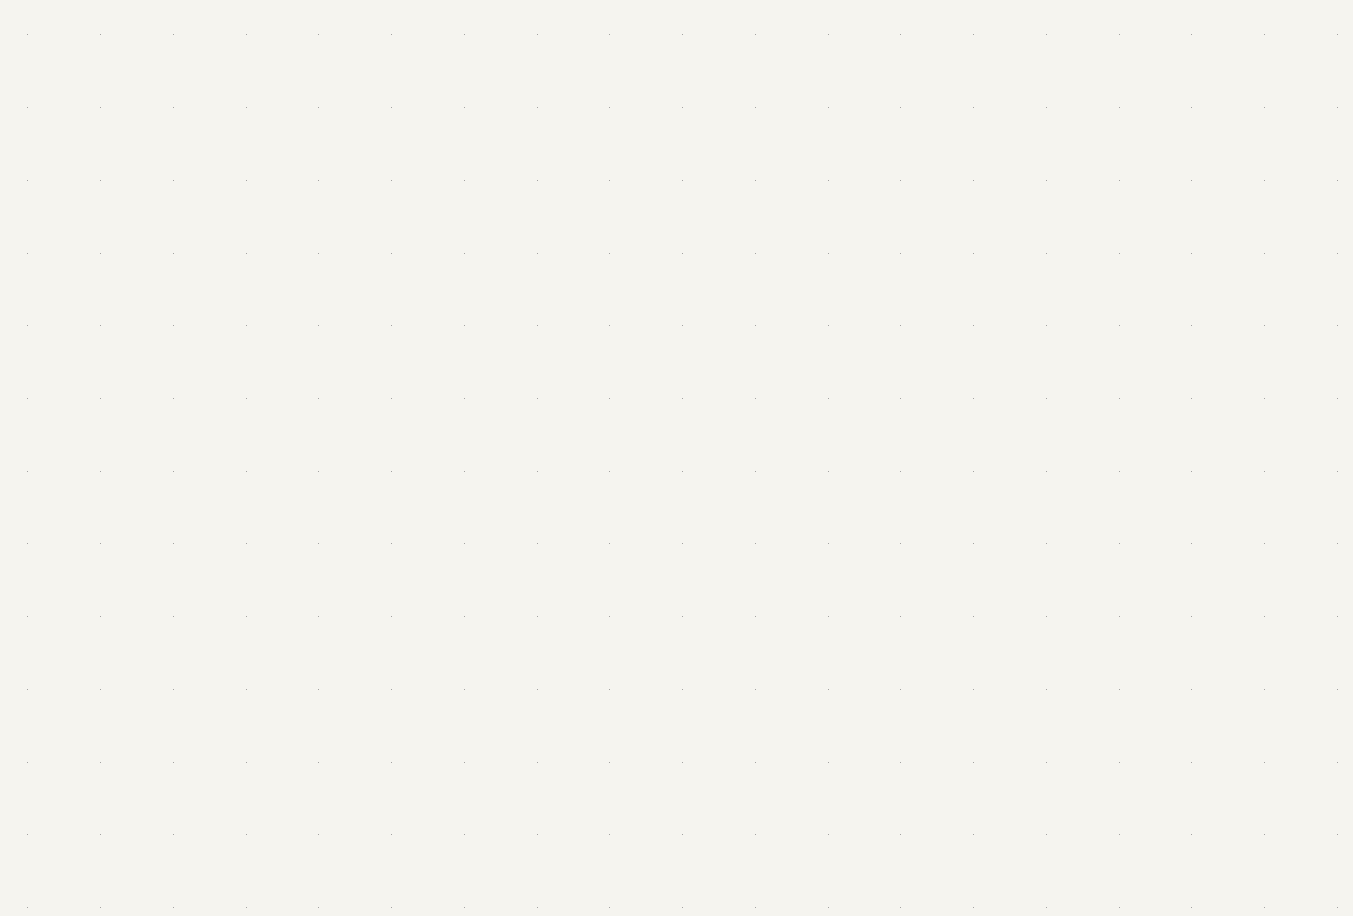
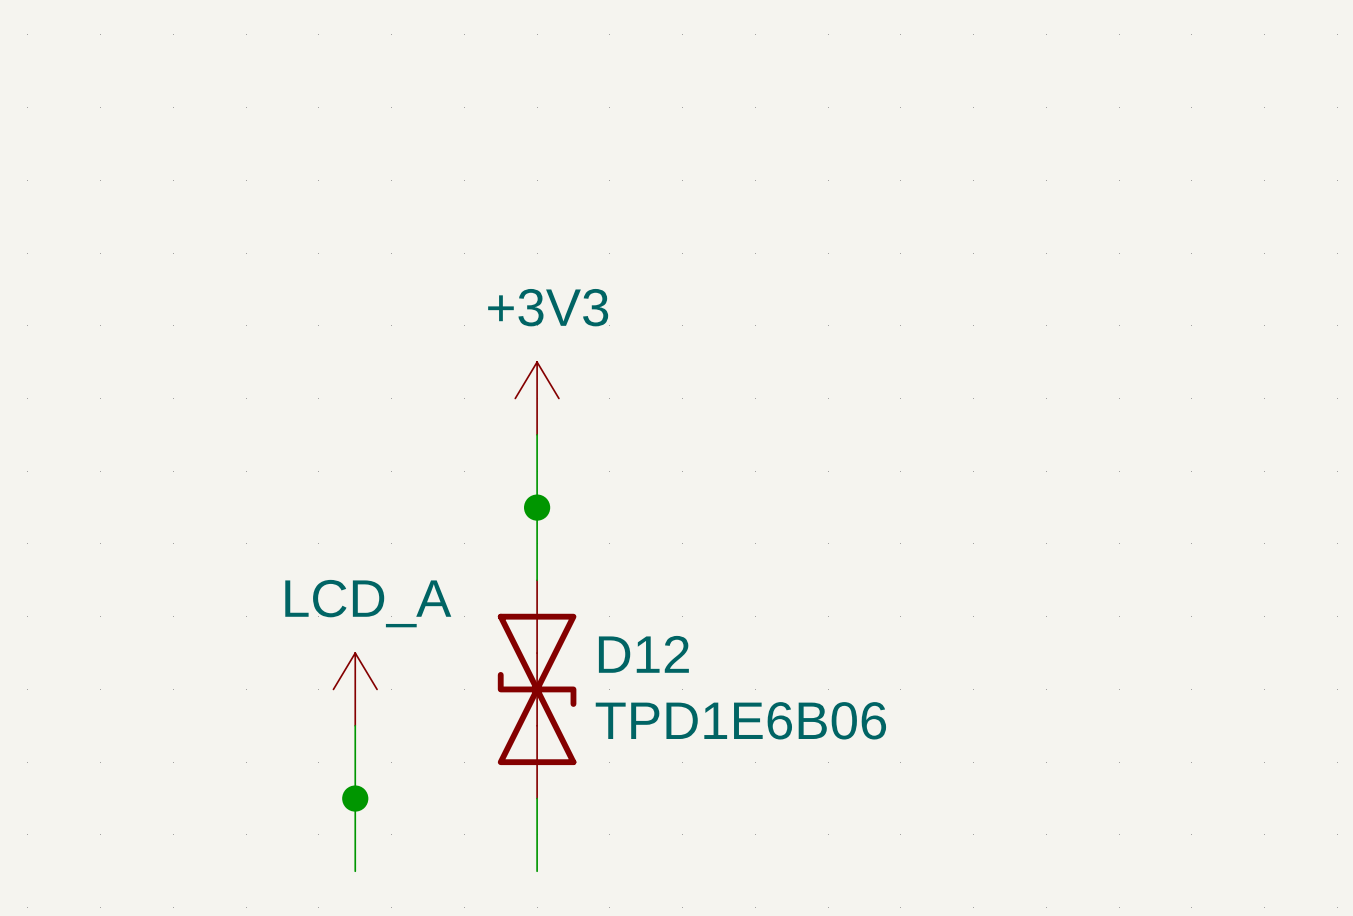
power symbol: none -> +3V3 (537, 398)
wire: none -> (537, 434) (537, 580)
junction: none -> (537, 507)
power symbol: none -> LCD_A (355, 689)
D12: none -> TPD1E6B06 (537, 689)
wire: none -> (355, 725) (355, 871)
junction: none -> (355, 798)
wire: none -> (537, 798) (537, 871)

